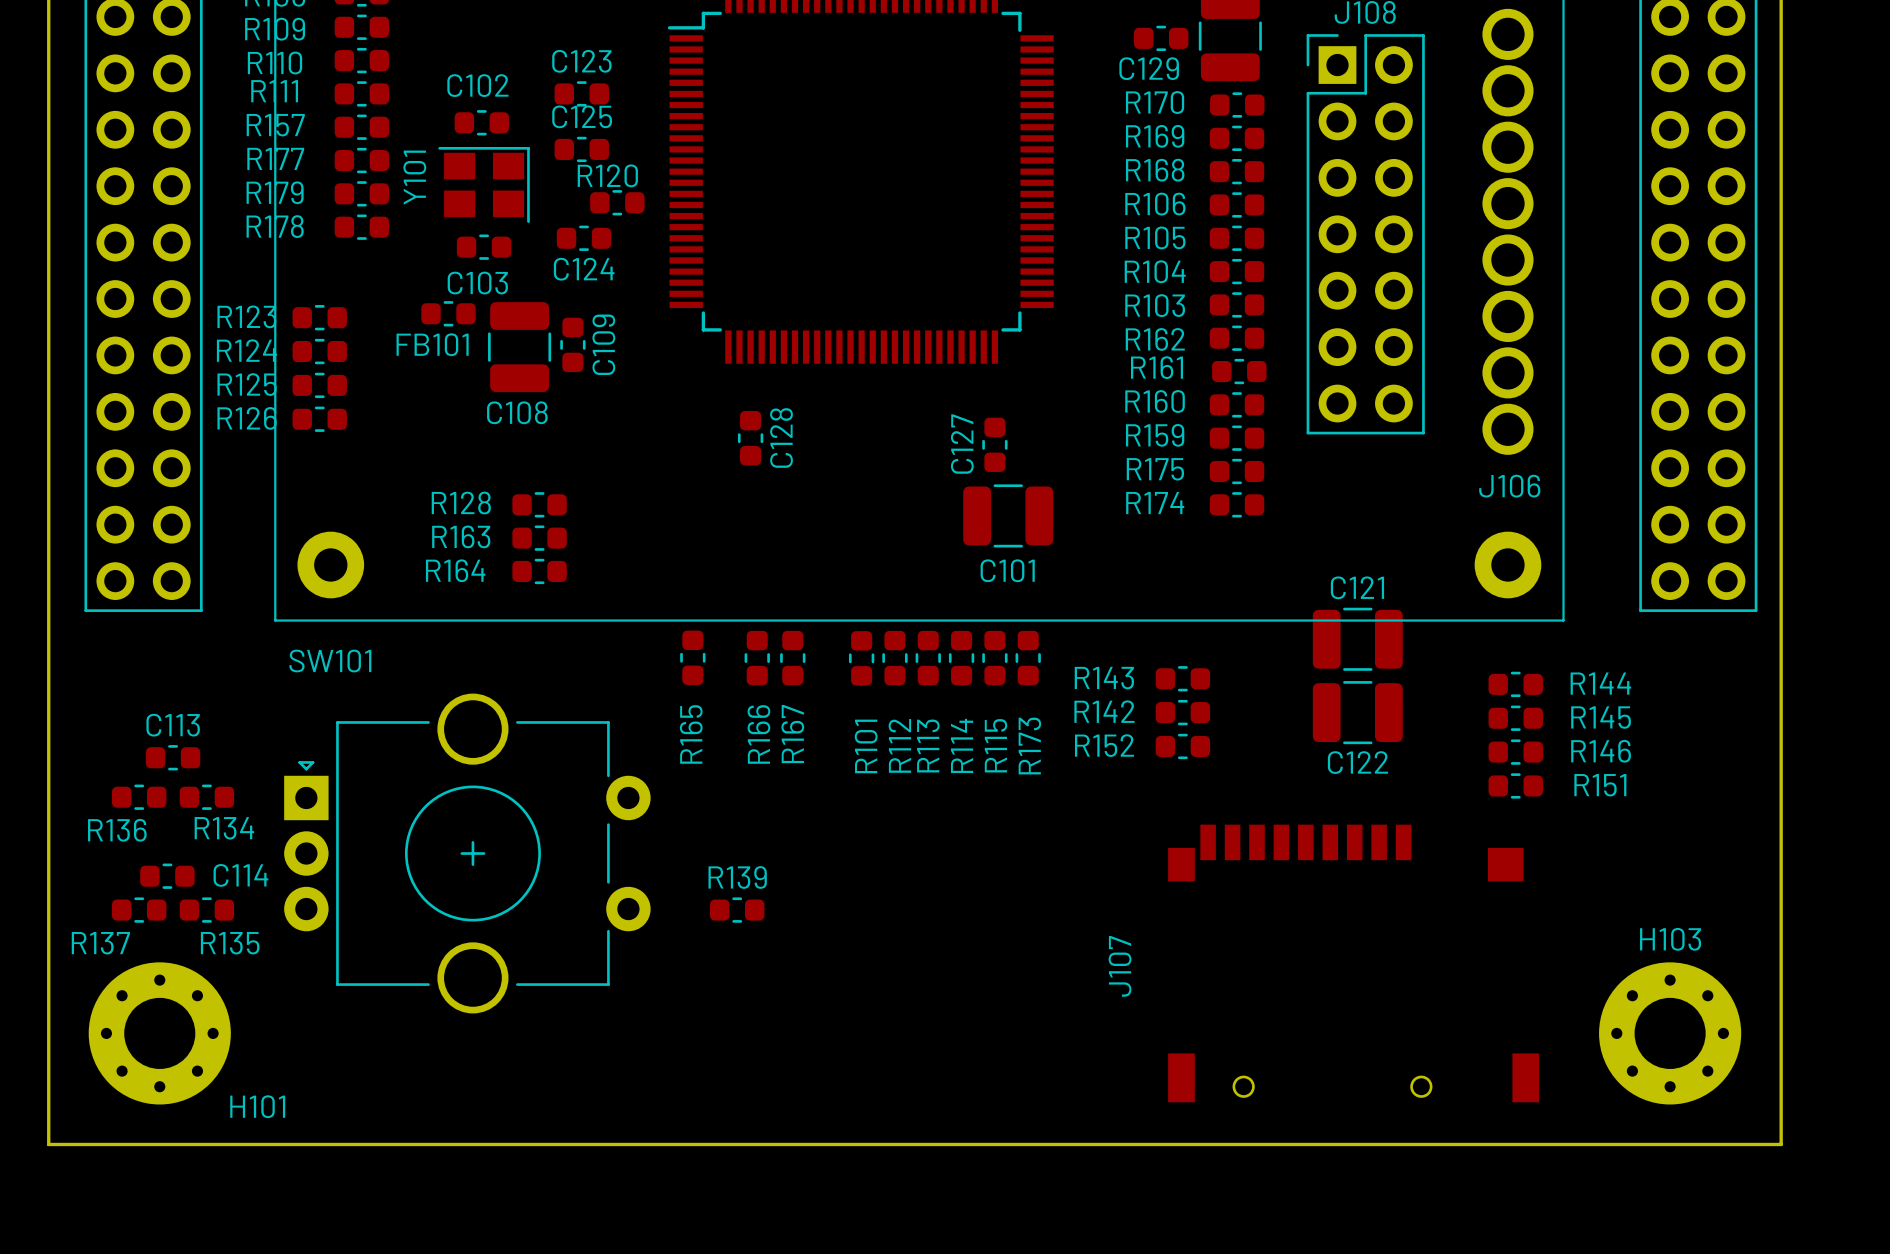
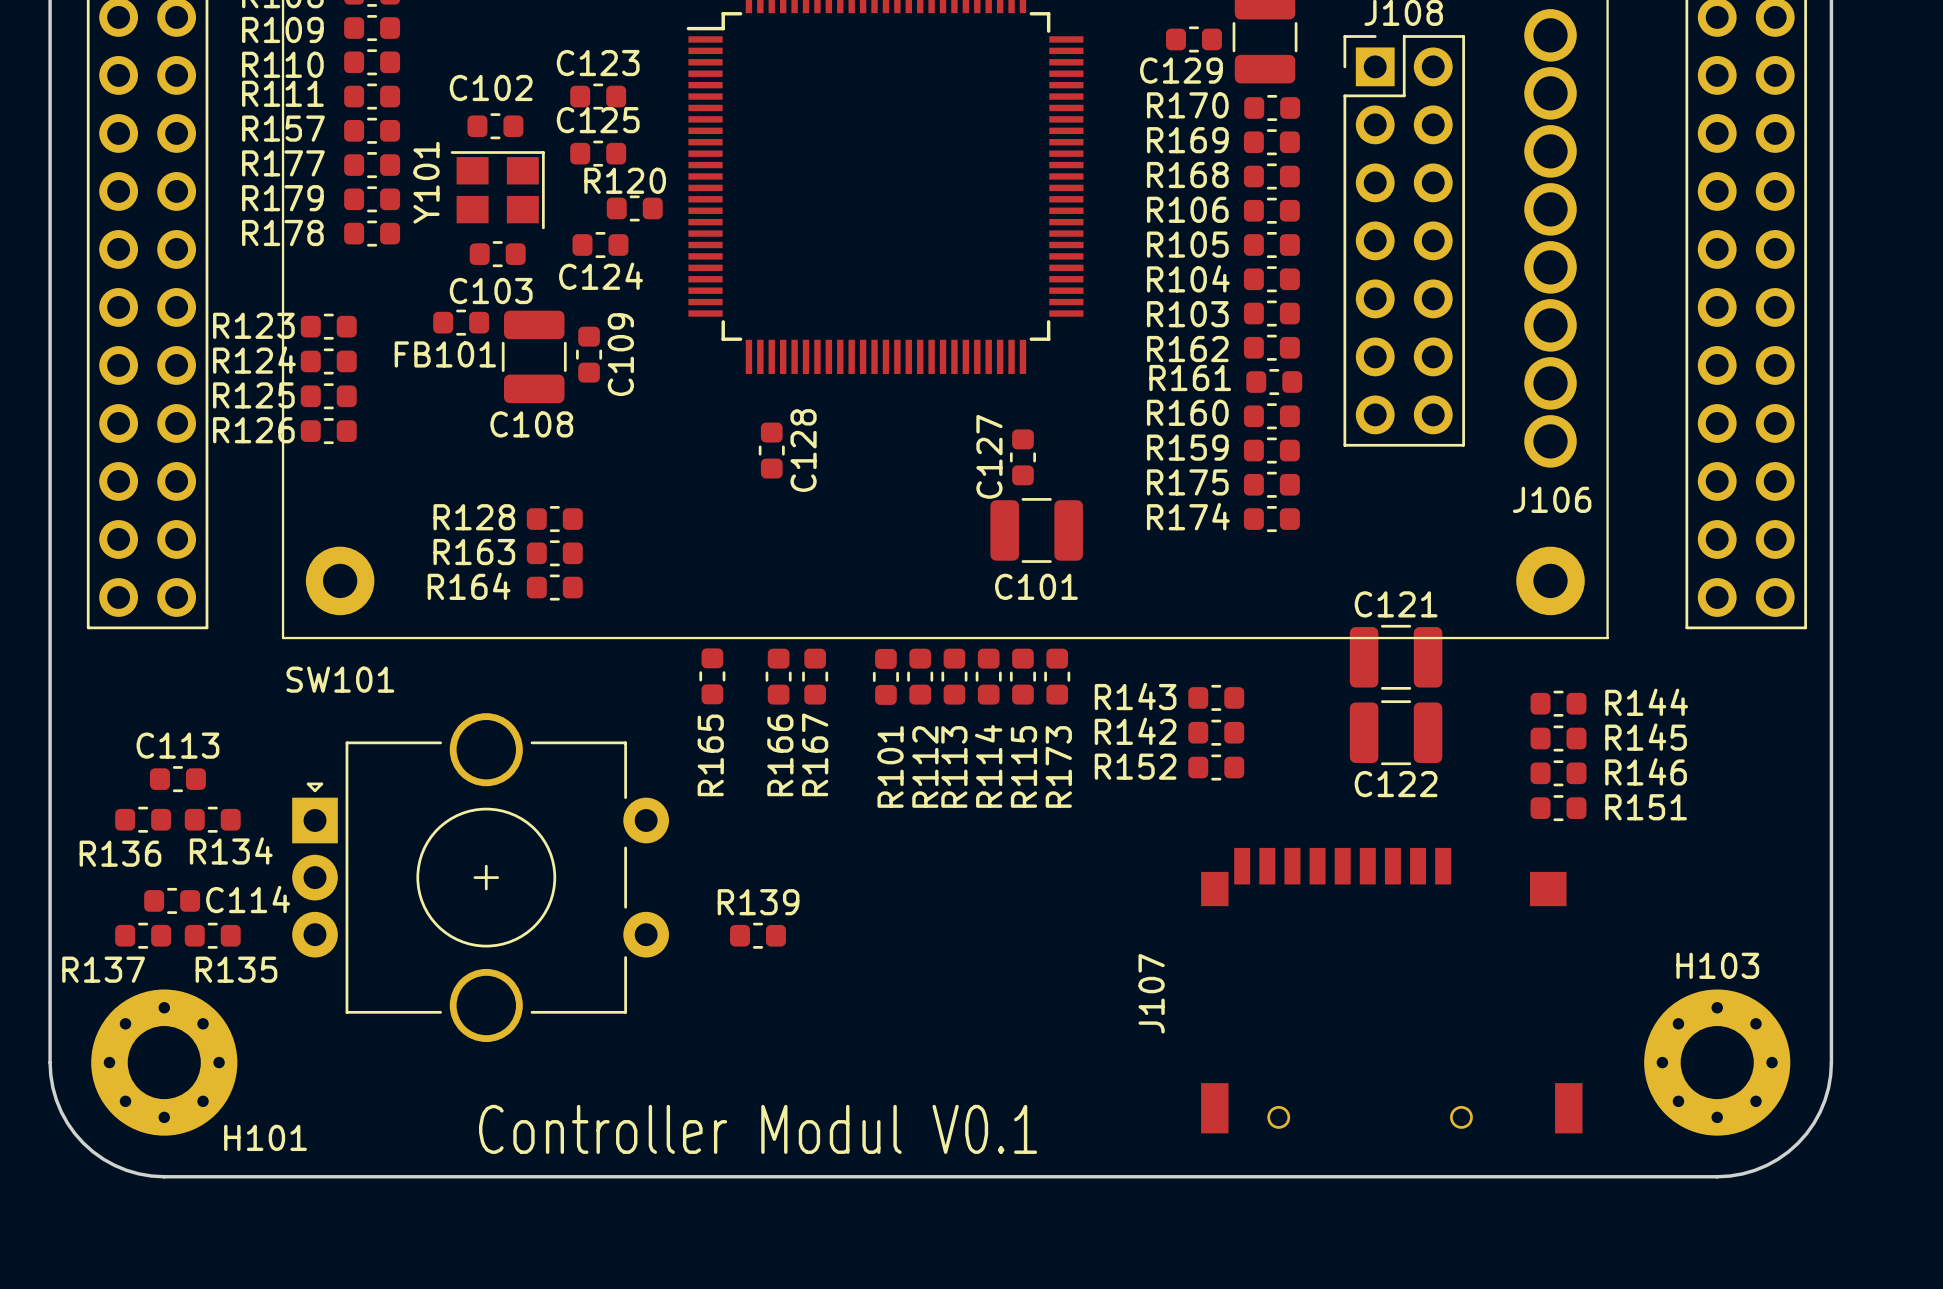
board edge: (48, 1033) (48, 1144) (159, 1144) -> (50, 1062) (56, 1100) (67, 1123) (83, 1143) (103, 1159) (126, 1170) (164, 1176)
board edge: (1781, 1033) (1781, 1144) (1670, 1144) -> (1831, 1062) (1825, 1100) (1813, 1123) (1797, 1143) (1777, 1159) (1754, 1170) (1717, 1176)
text: none -> Controller Modul V0.1 (758, 1129)

